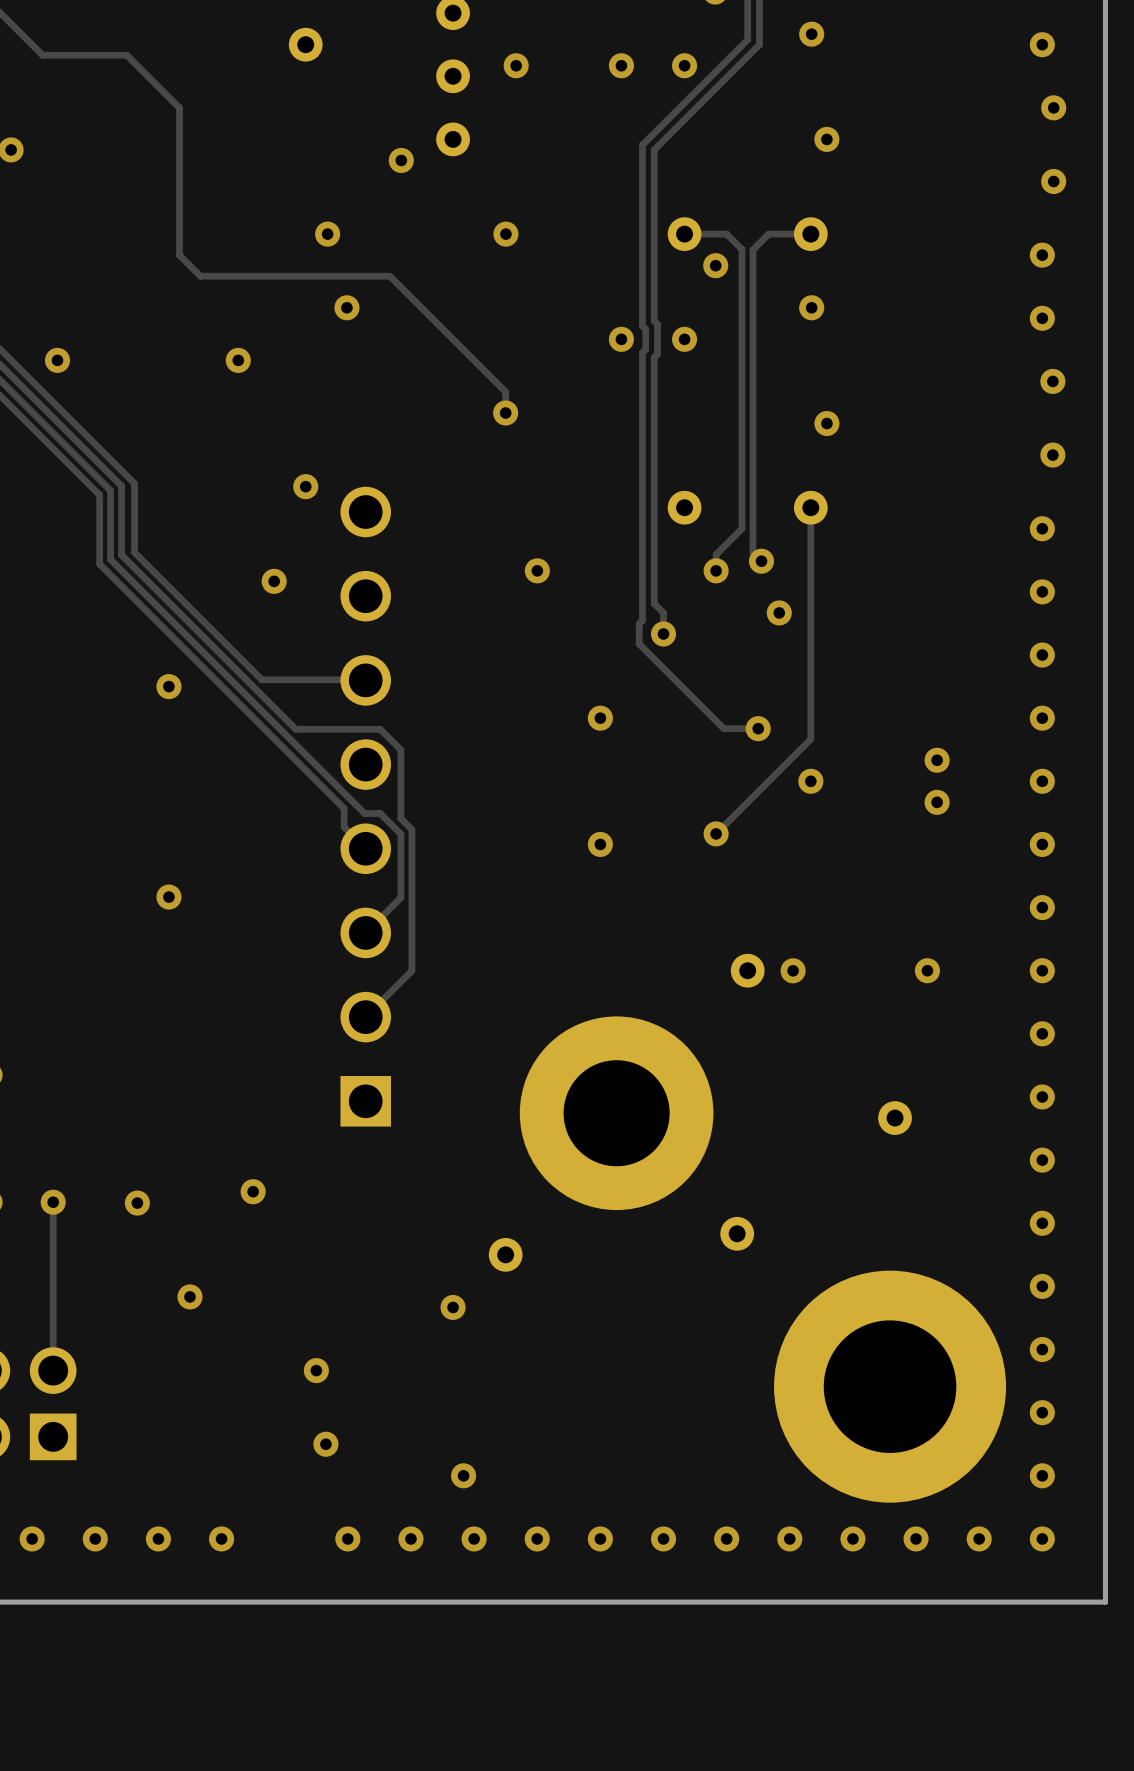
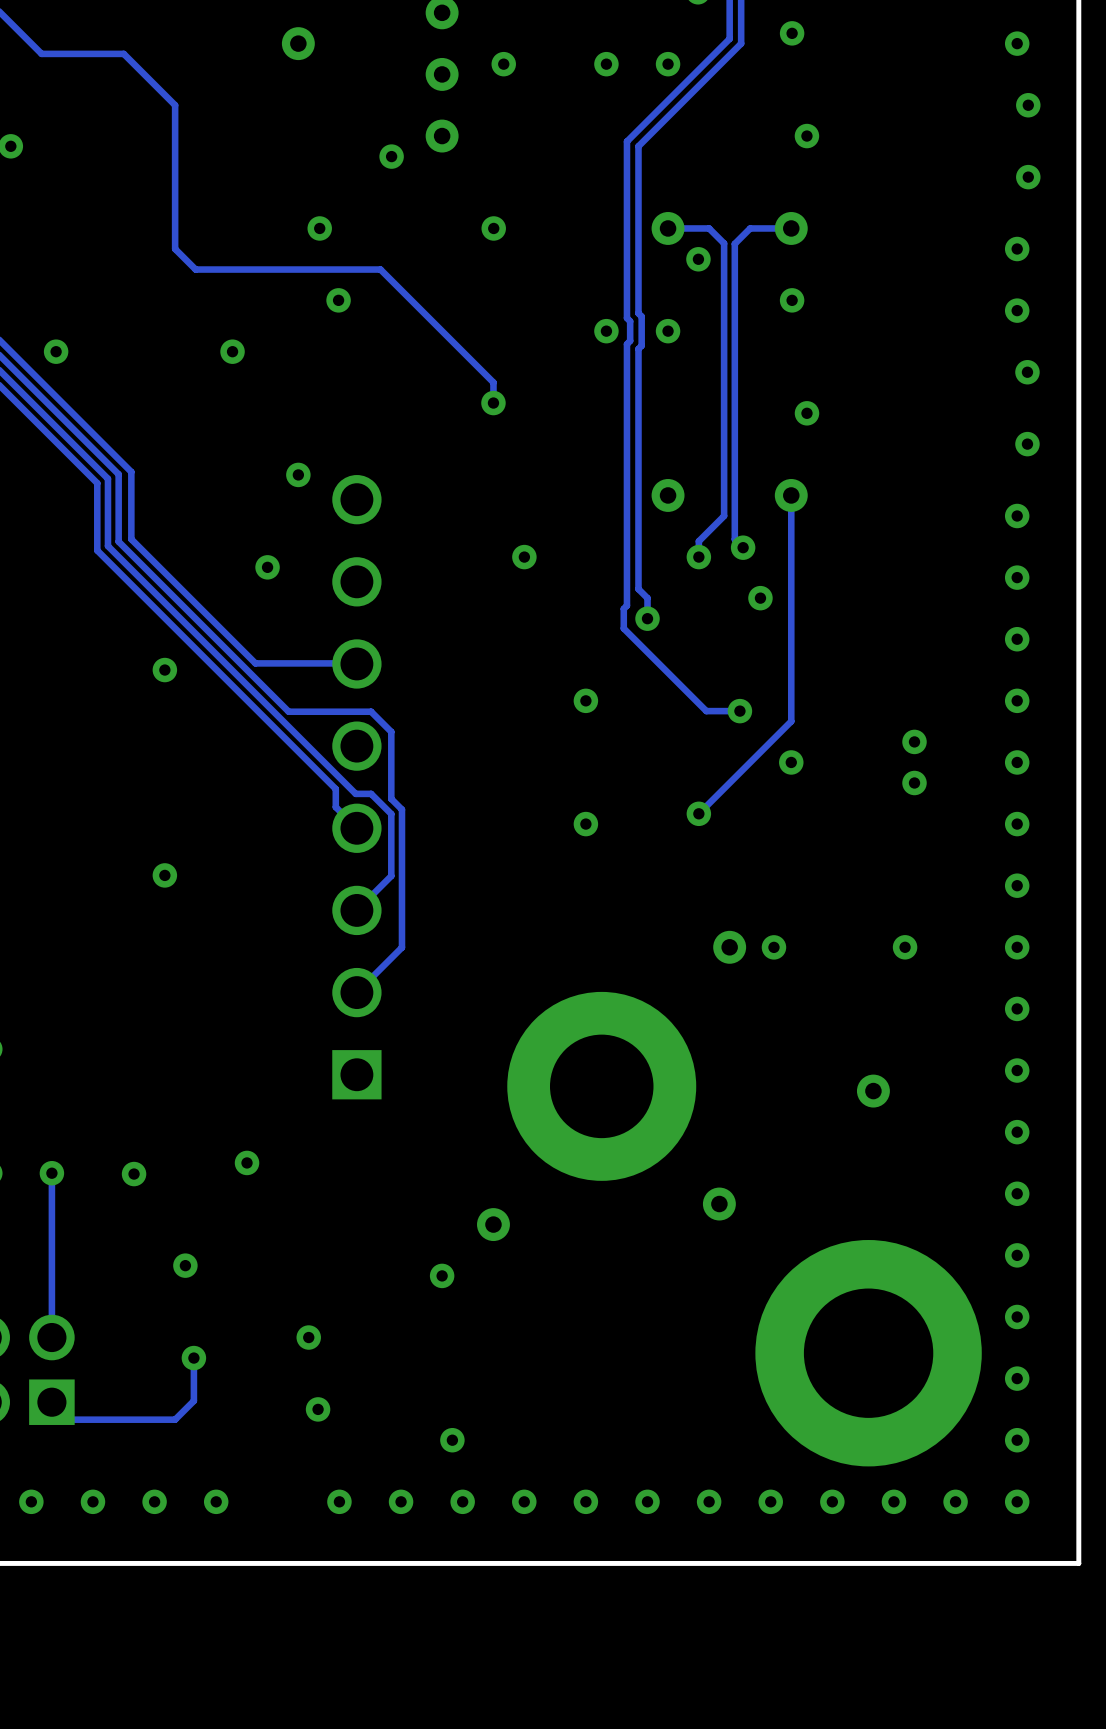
track: none -> (193, 1358) (193, 1400) (175, 1419) (69, 1419) (51, 1402)
via: none -> (193, 1358)

